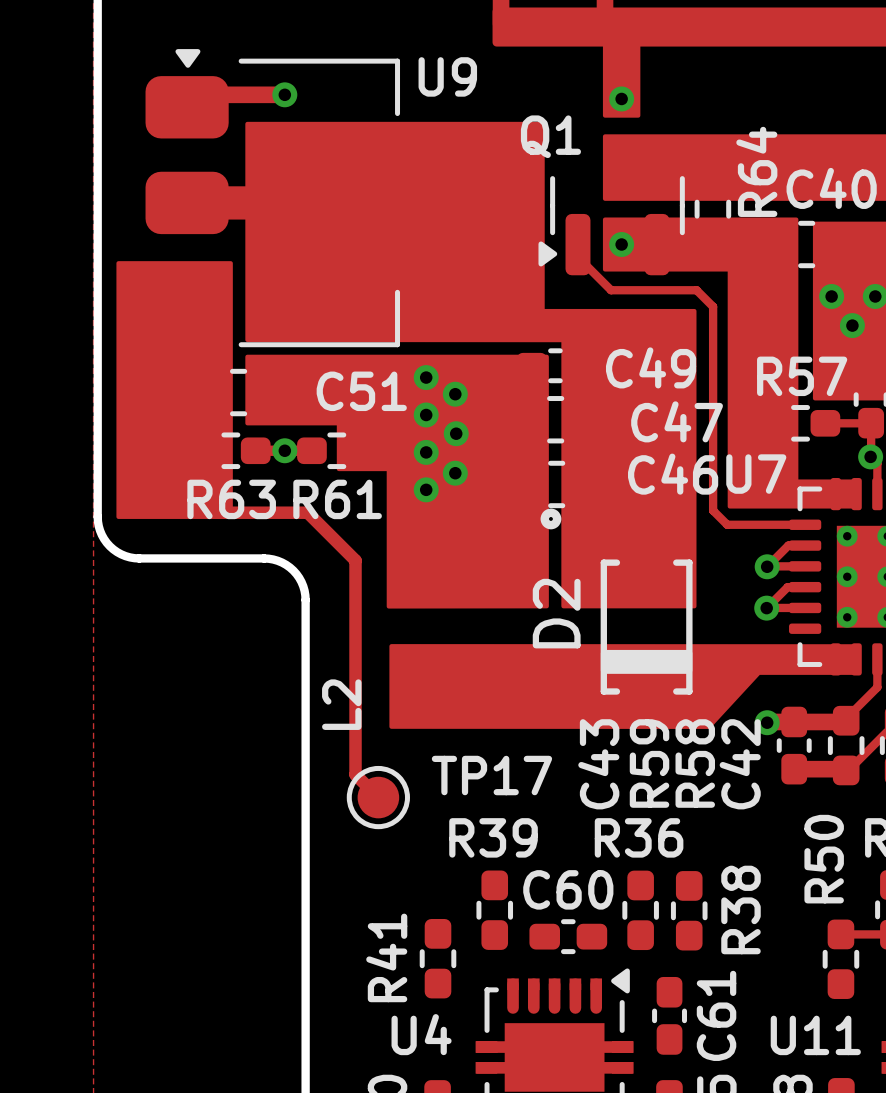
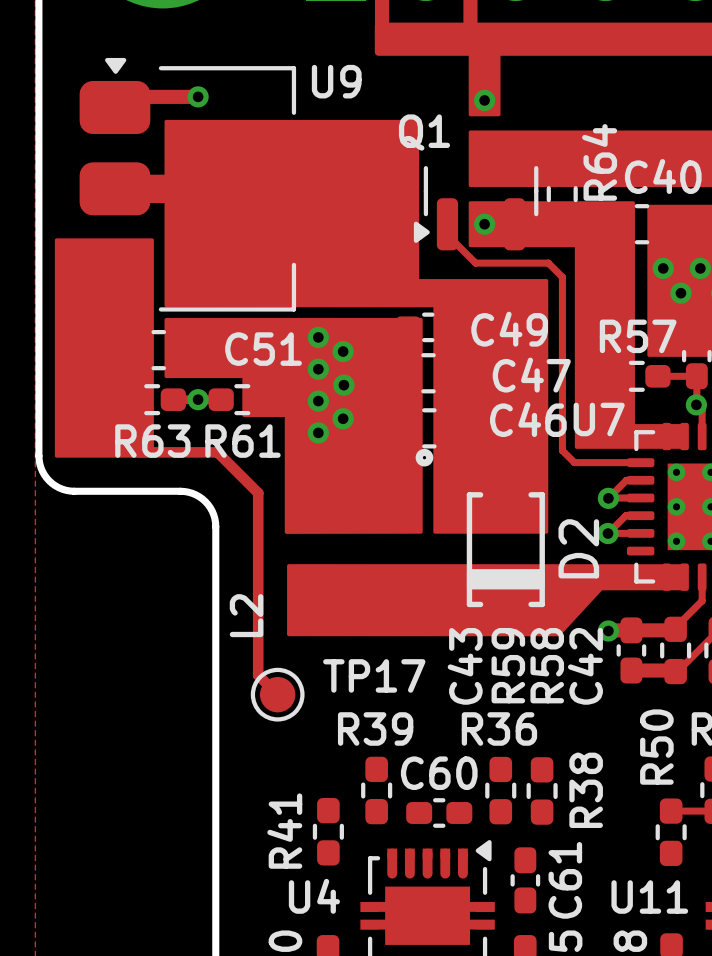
D2 name position: D2 (556, 613) -> D2 (578, 548)

